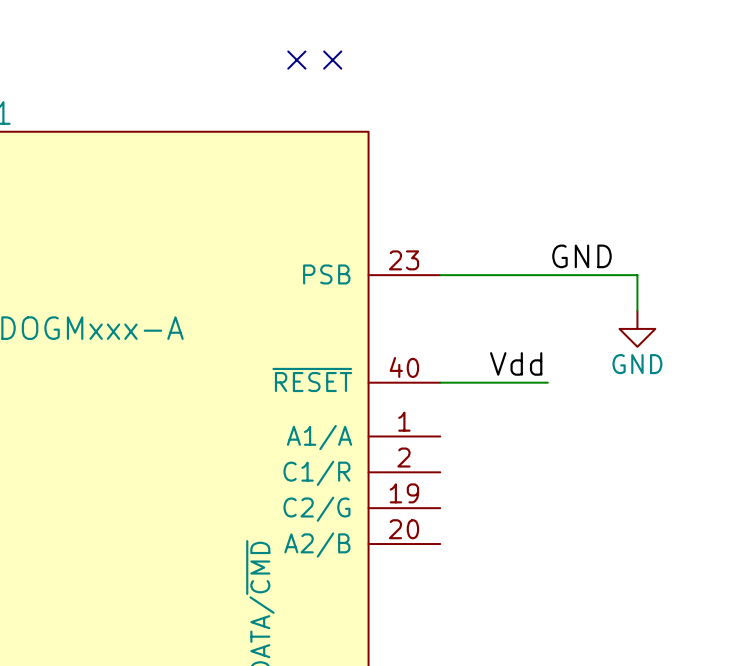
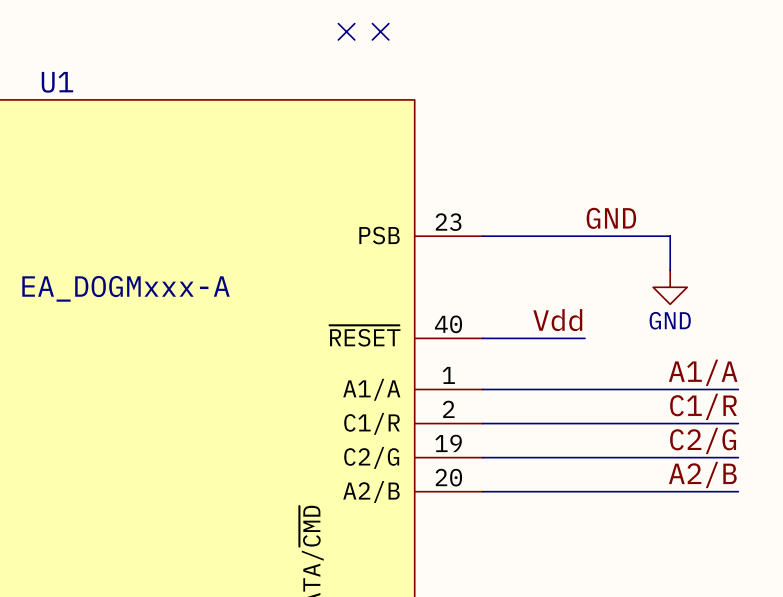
label: none -> A1/A (703, 372)
wire: none -> (482, 389) (738, 389)
label: none -> C1/R (703, 406)
wire: none -> (482, 423) (738, 423)
label: none -> C2/G (703, 440)
wire: none -> (482, 457) (738, 457)
label: none -> A2/B (702, 474)
wire: none -> (482, 491) (738, 491)

